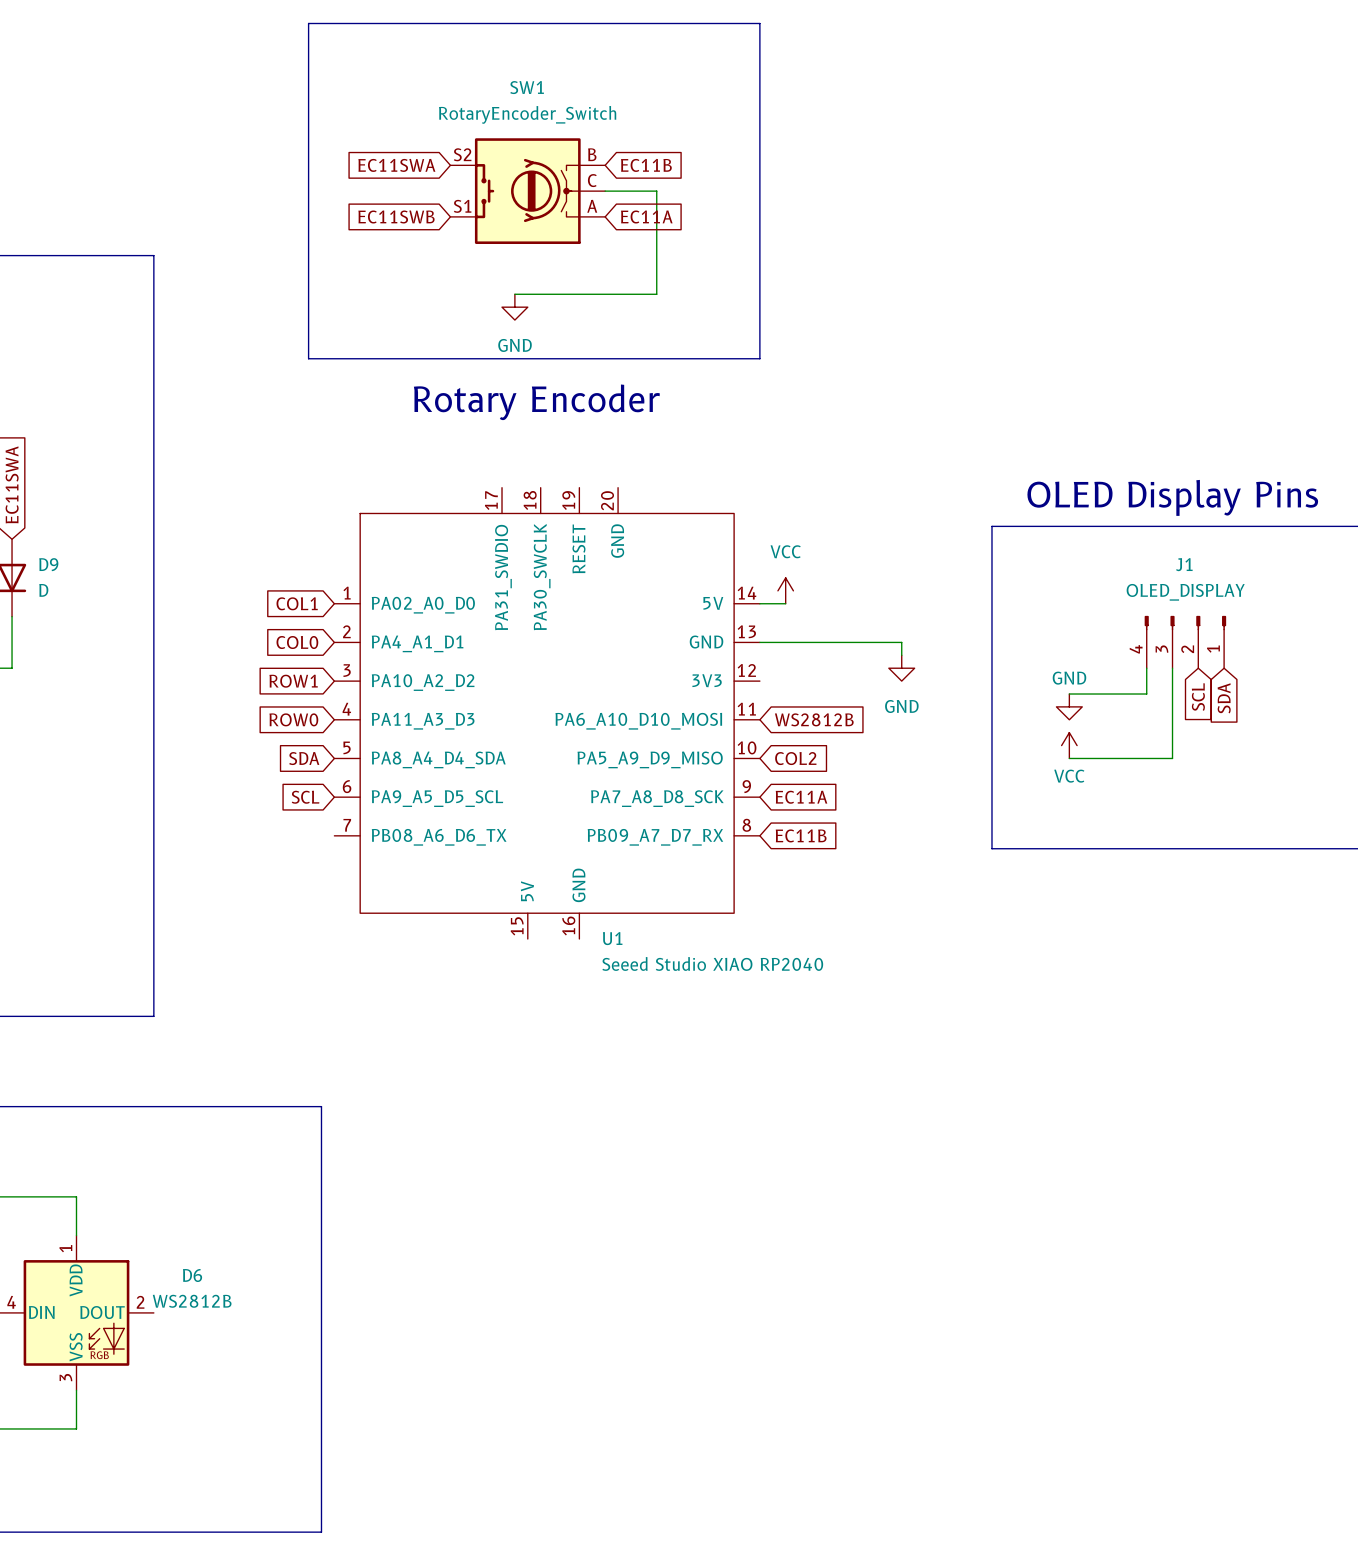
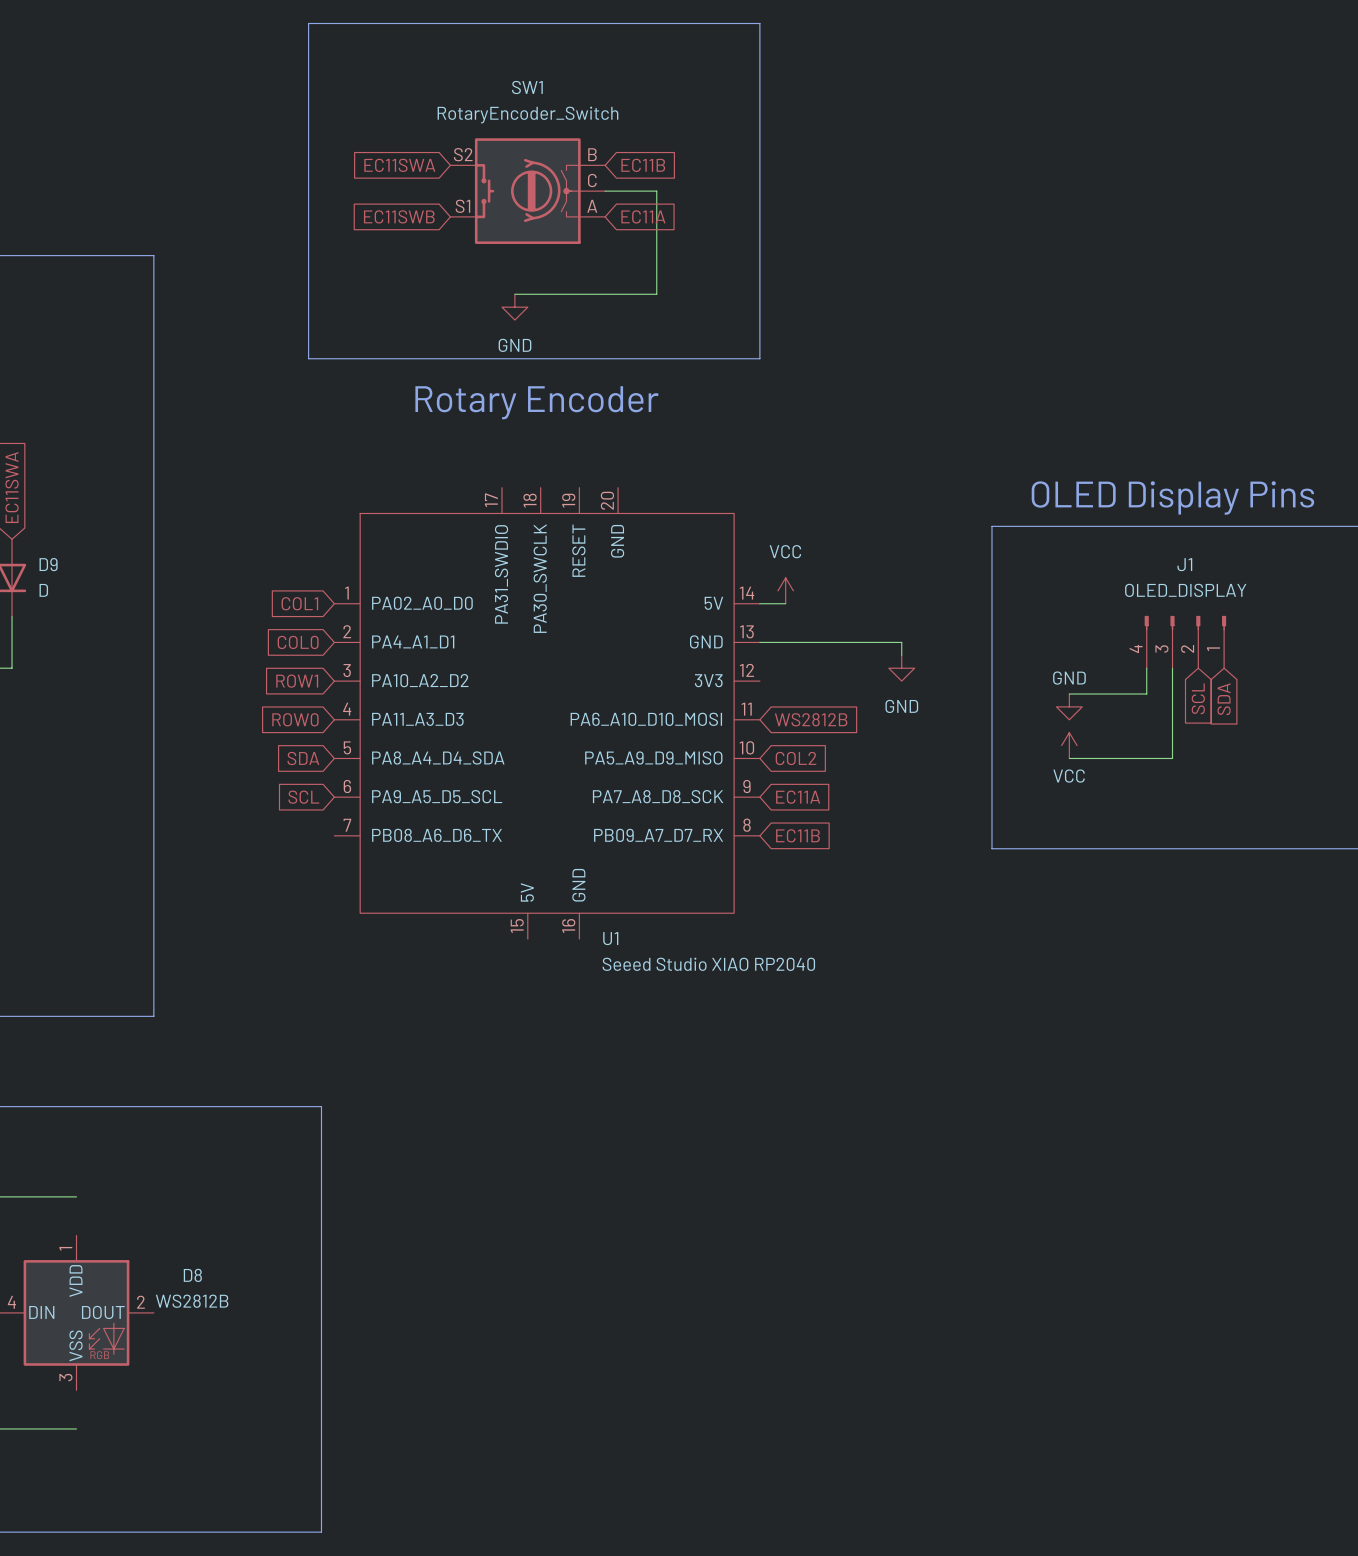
wire: (76, 1196) (76, 1235) -> none
D6 name: D6 (192, 1275) -> D8 (192, 1275)
wire: (76, 1390) (76, 1428) -> none

